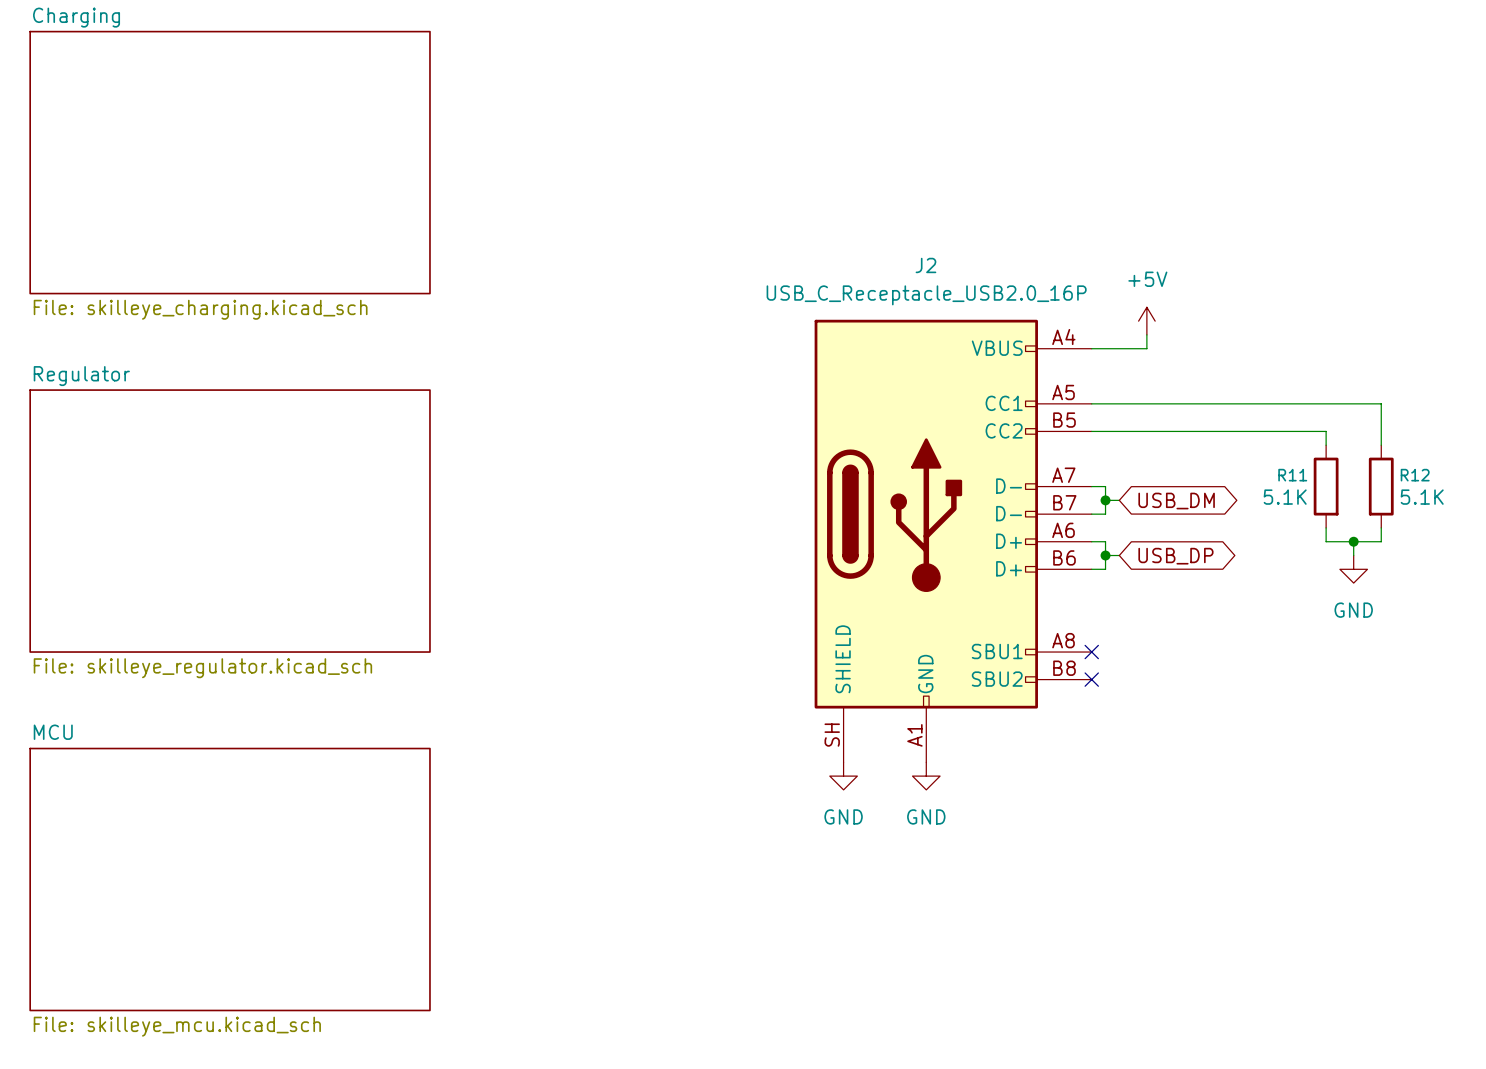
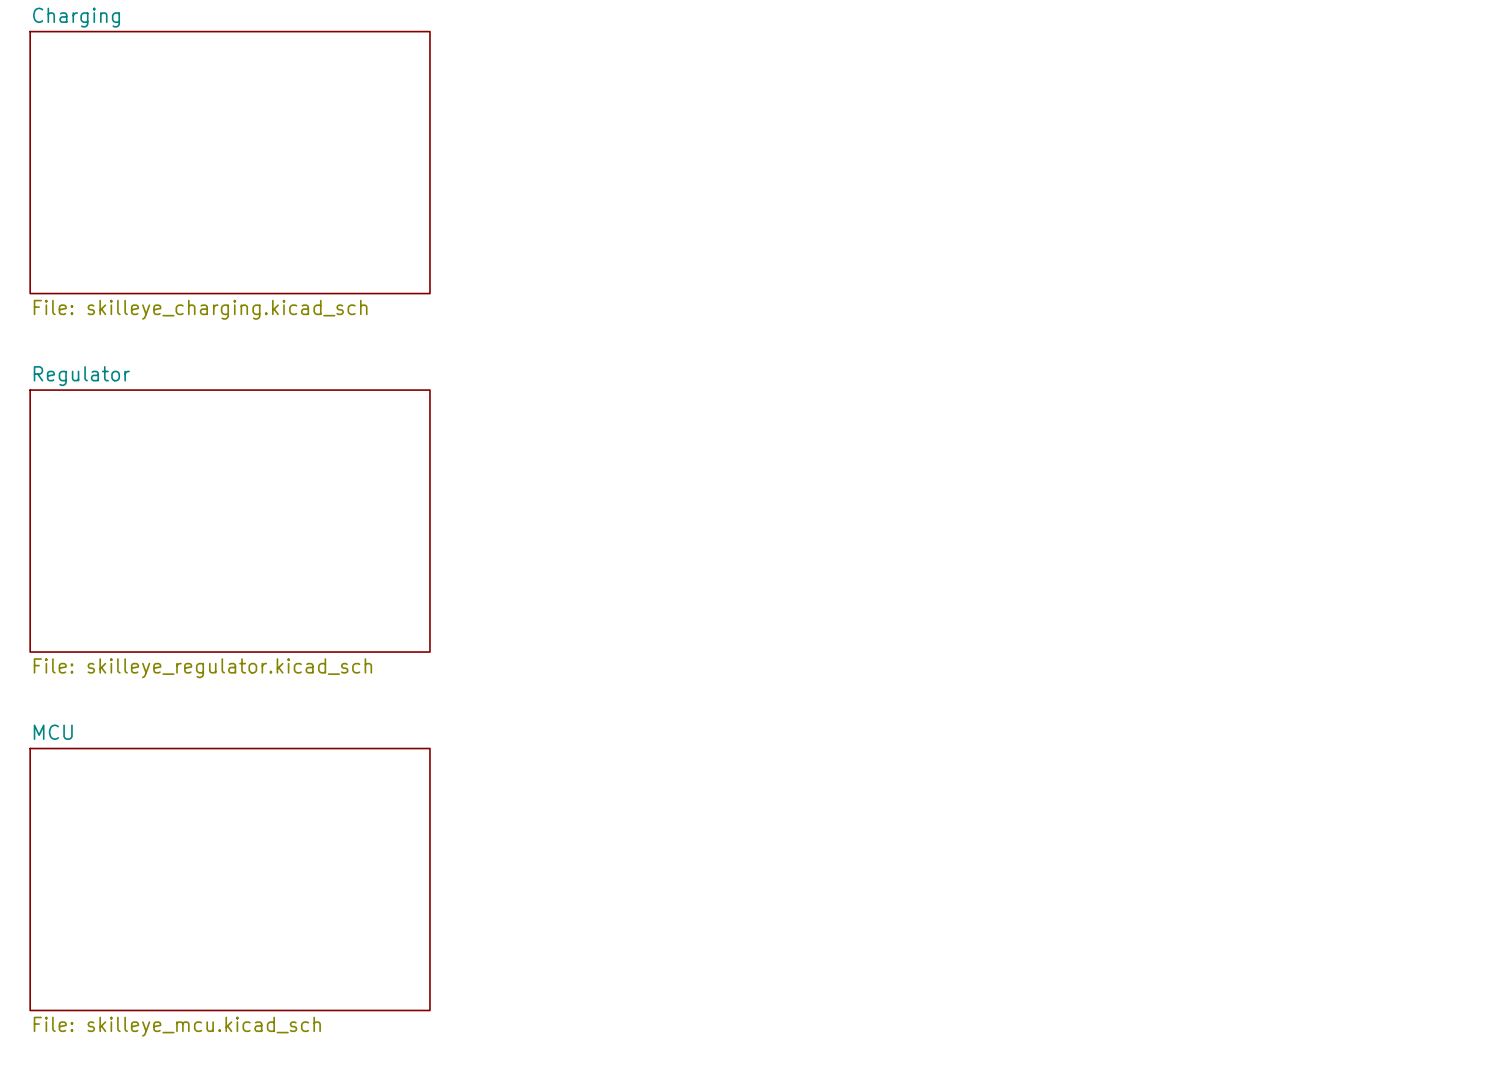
power symbol: +5V (1146, 321) -> none
wire: (1146, 334) (1146, 348) (1091, 348) -> none
wire: (1091, 403) (1381, 403) (1381, 445) -> none
wire: (1091, 431) (1326, 431) (1326, 445) -> none
wire: (1091, 486) (1105, 486) (1105, 514) (1091, 514) -> none
R11: 5.1K (1326, 486) -> none
R12: 5.1K (1381, 486) -> none
wire: (1105, 500) (1119, 500) -> none
junction: (1105, 500) -> none
global label: USB_DM (1176, 501) -> none
wire: (1326, 527) (1326, 541) (1381, 541) (1381, 527) -> none
J2: USB_C_Receptacle_USB2.0_16P (953, 541) -> none
wire: (1091, 541) (1105, 541) (1105, 569) (1091, 569) -> none
wire: (1353, 541) (1353, 555) -> none
junction: (1353, 541) -> none
wire: (1105, 555) (1119, 555) -> none
junction: (1105, 555) -> none
global label: USB_DP (1175, 556) -> none
power symbol: GND (1353, 569) -> none
no-connect mark: (1091, 652) -> none
no-connect mark: (1091, 679) -> none
power symbol: GND (843, 776) -> none
power symbol: GND (926, 776) -> none

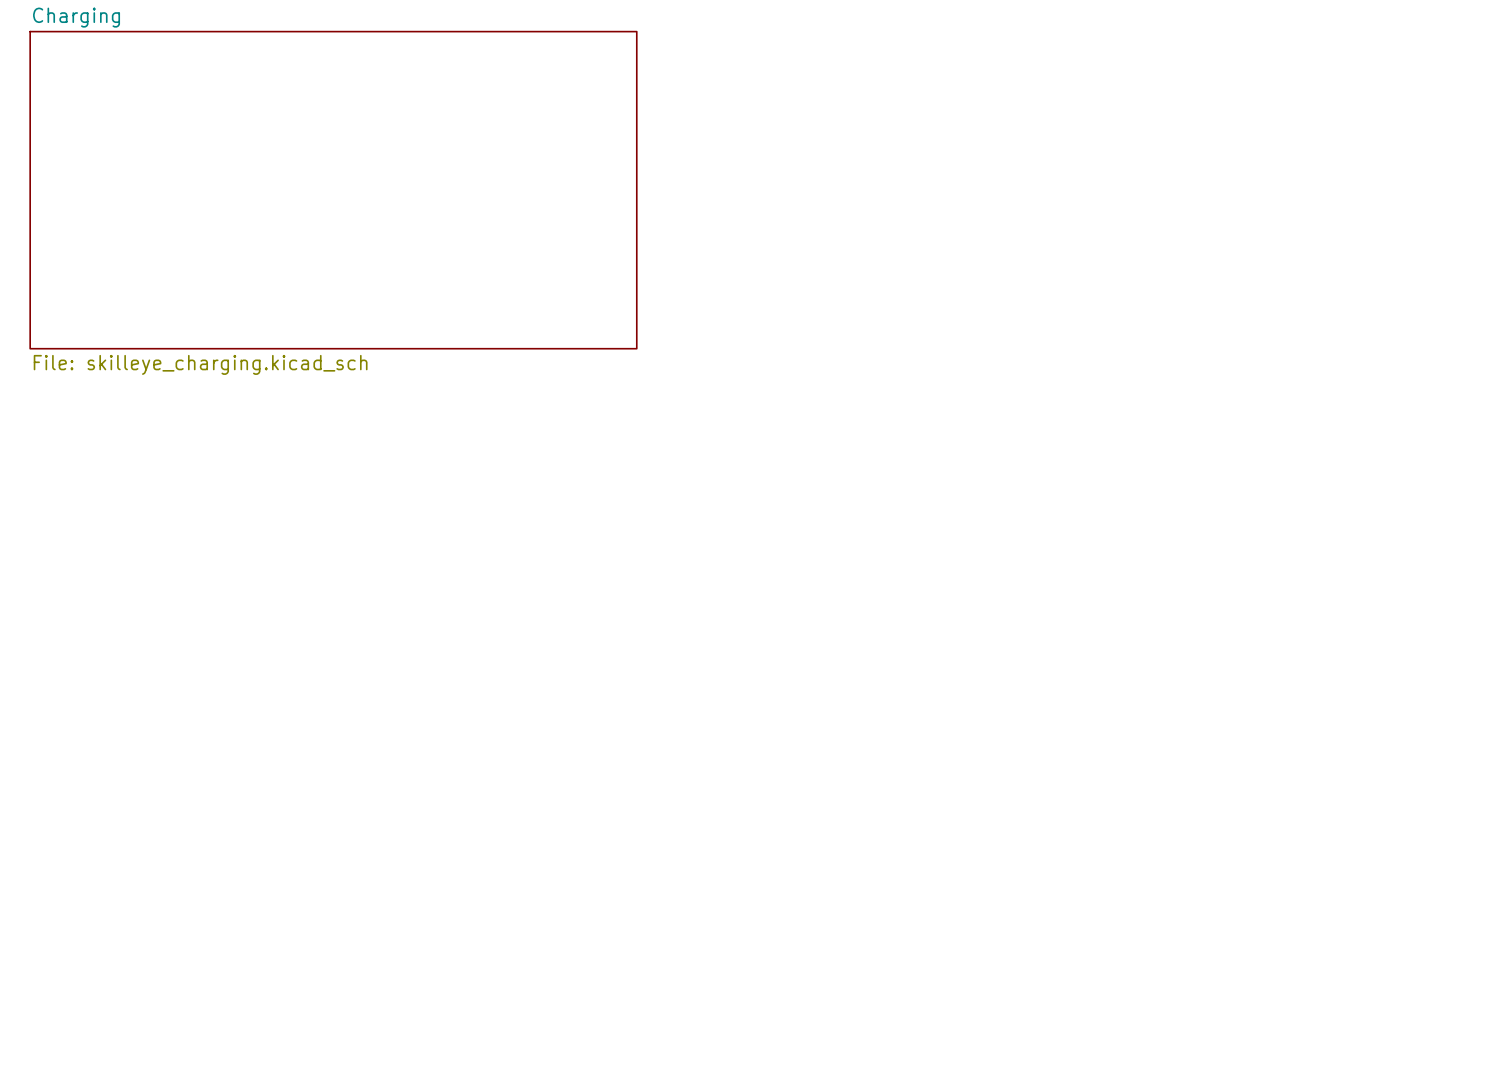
sheet Charging: File: skilleye_charging.kicad_sch (230, 162) -> none
sheet Charging: none -> File: skilleye_charging.kicad_sch (333, 190)
sheet Regulator: File: skilleye_regulator.kicad_sch (230, 521) -> none
sheet MCU: File: skilleye_mcu.kicad_sch (230, 879) -> none

